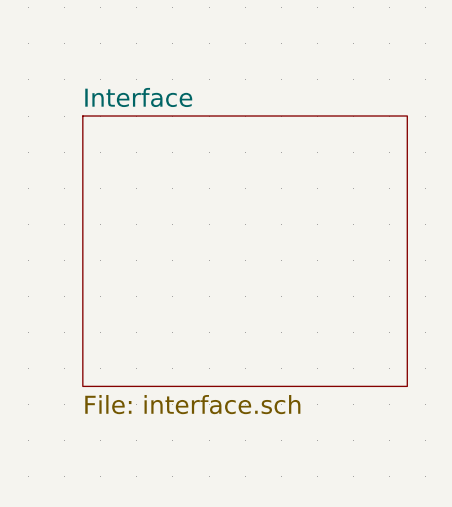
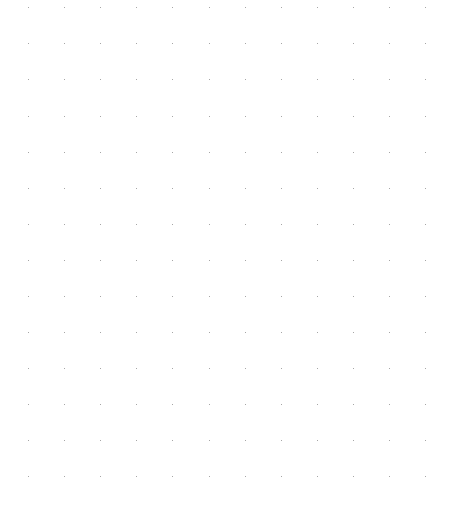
sheet Interface: File: interface.sch (245, 251) -> none

